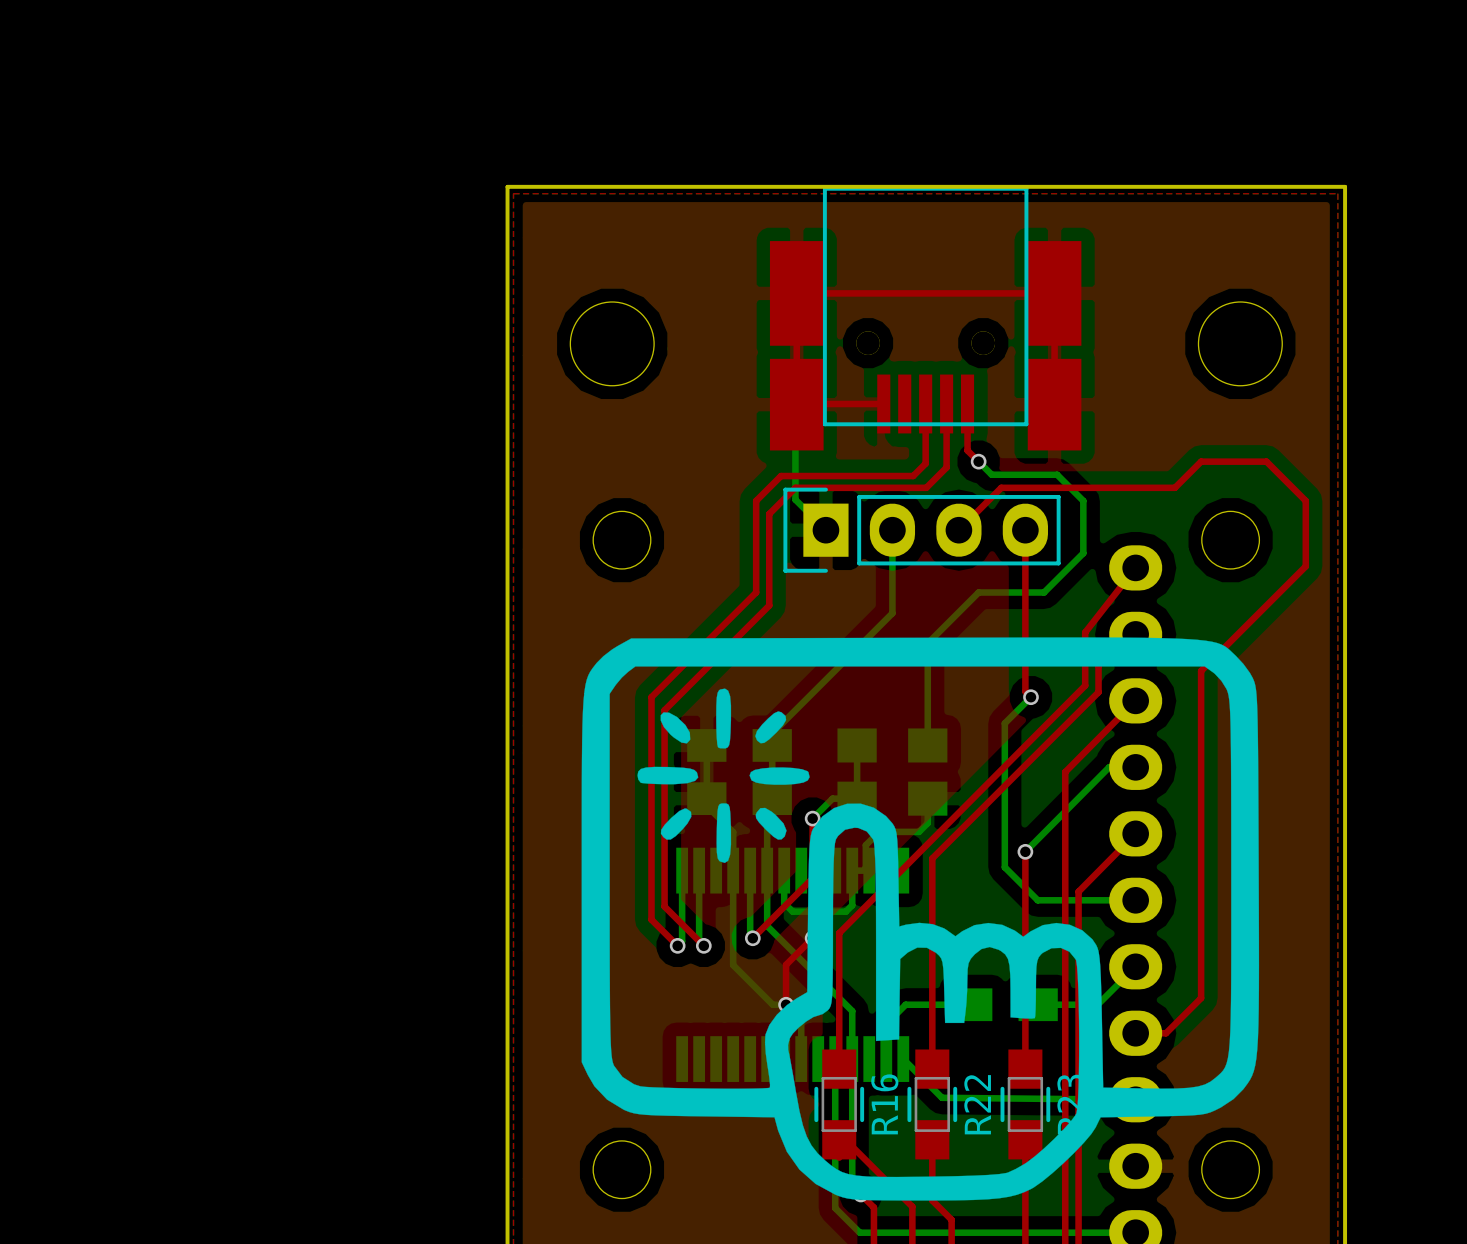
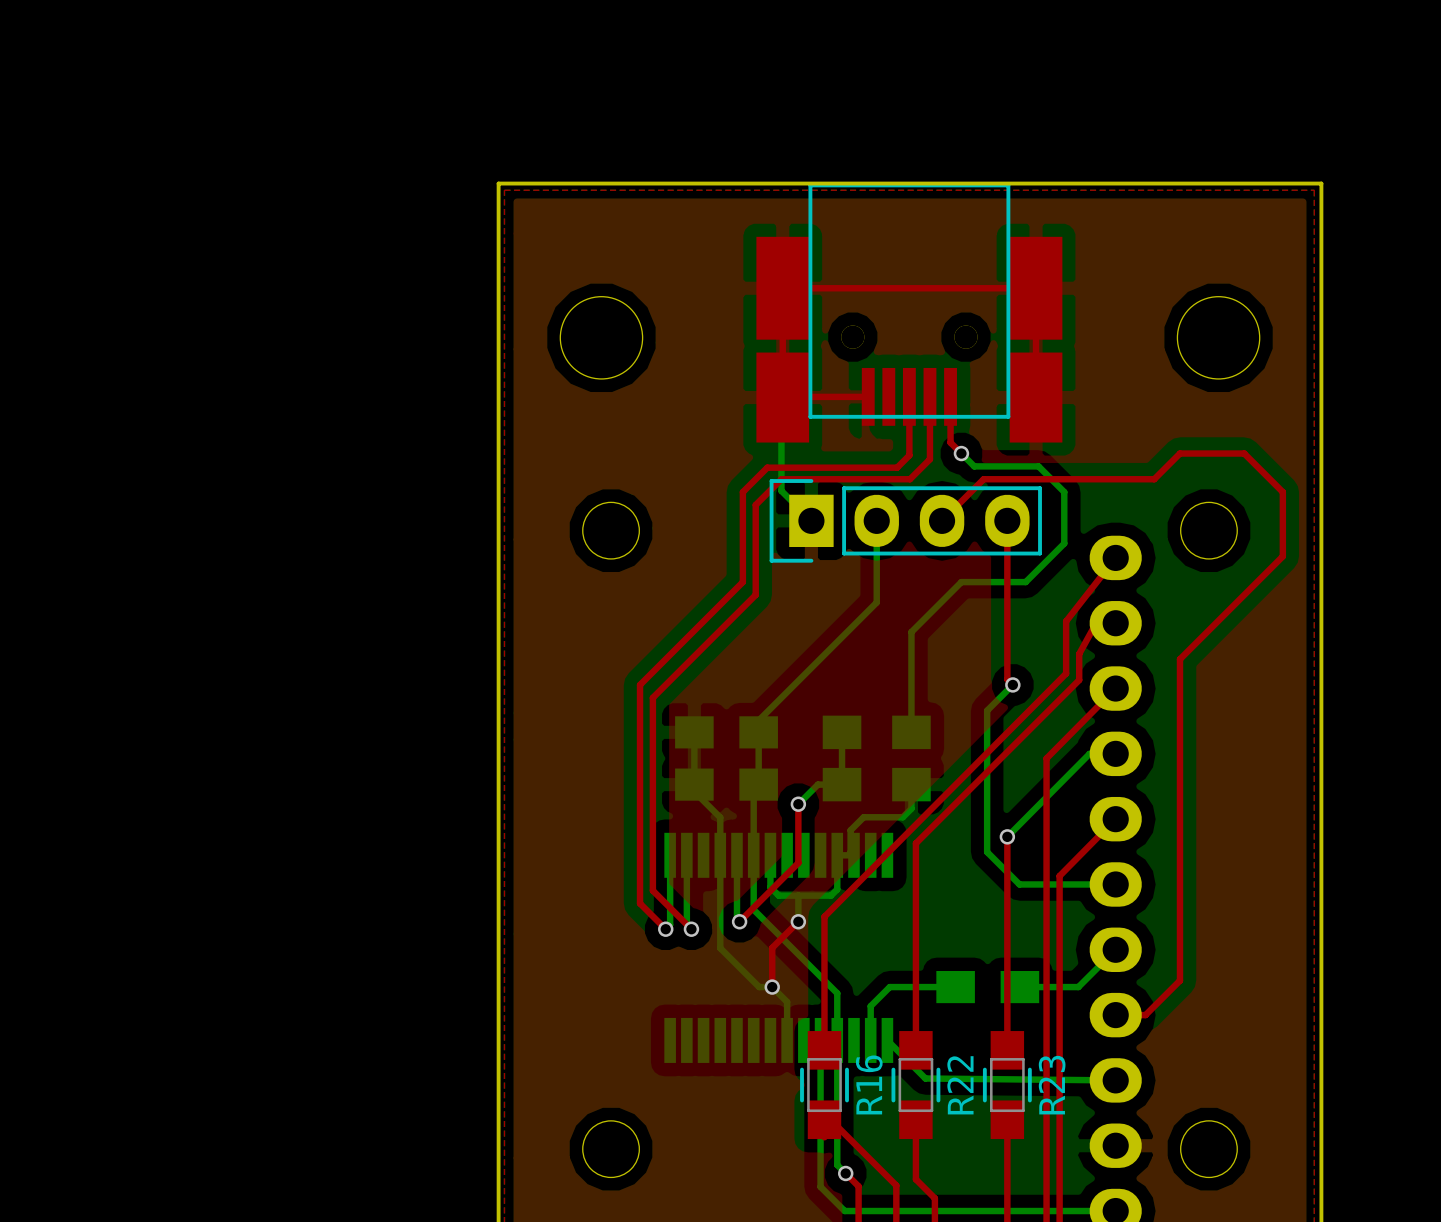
drawing: [581, 637, 1260, 1201] -> none

